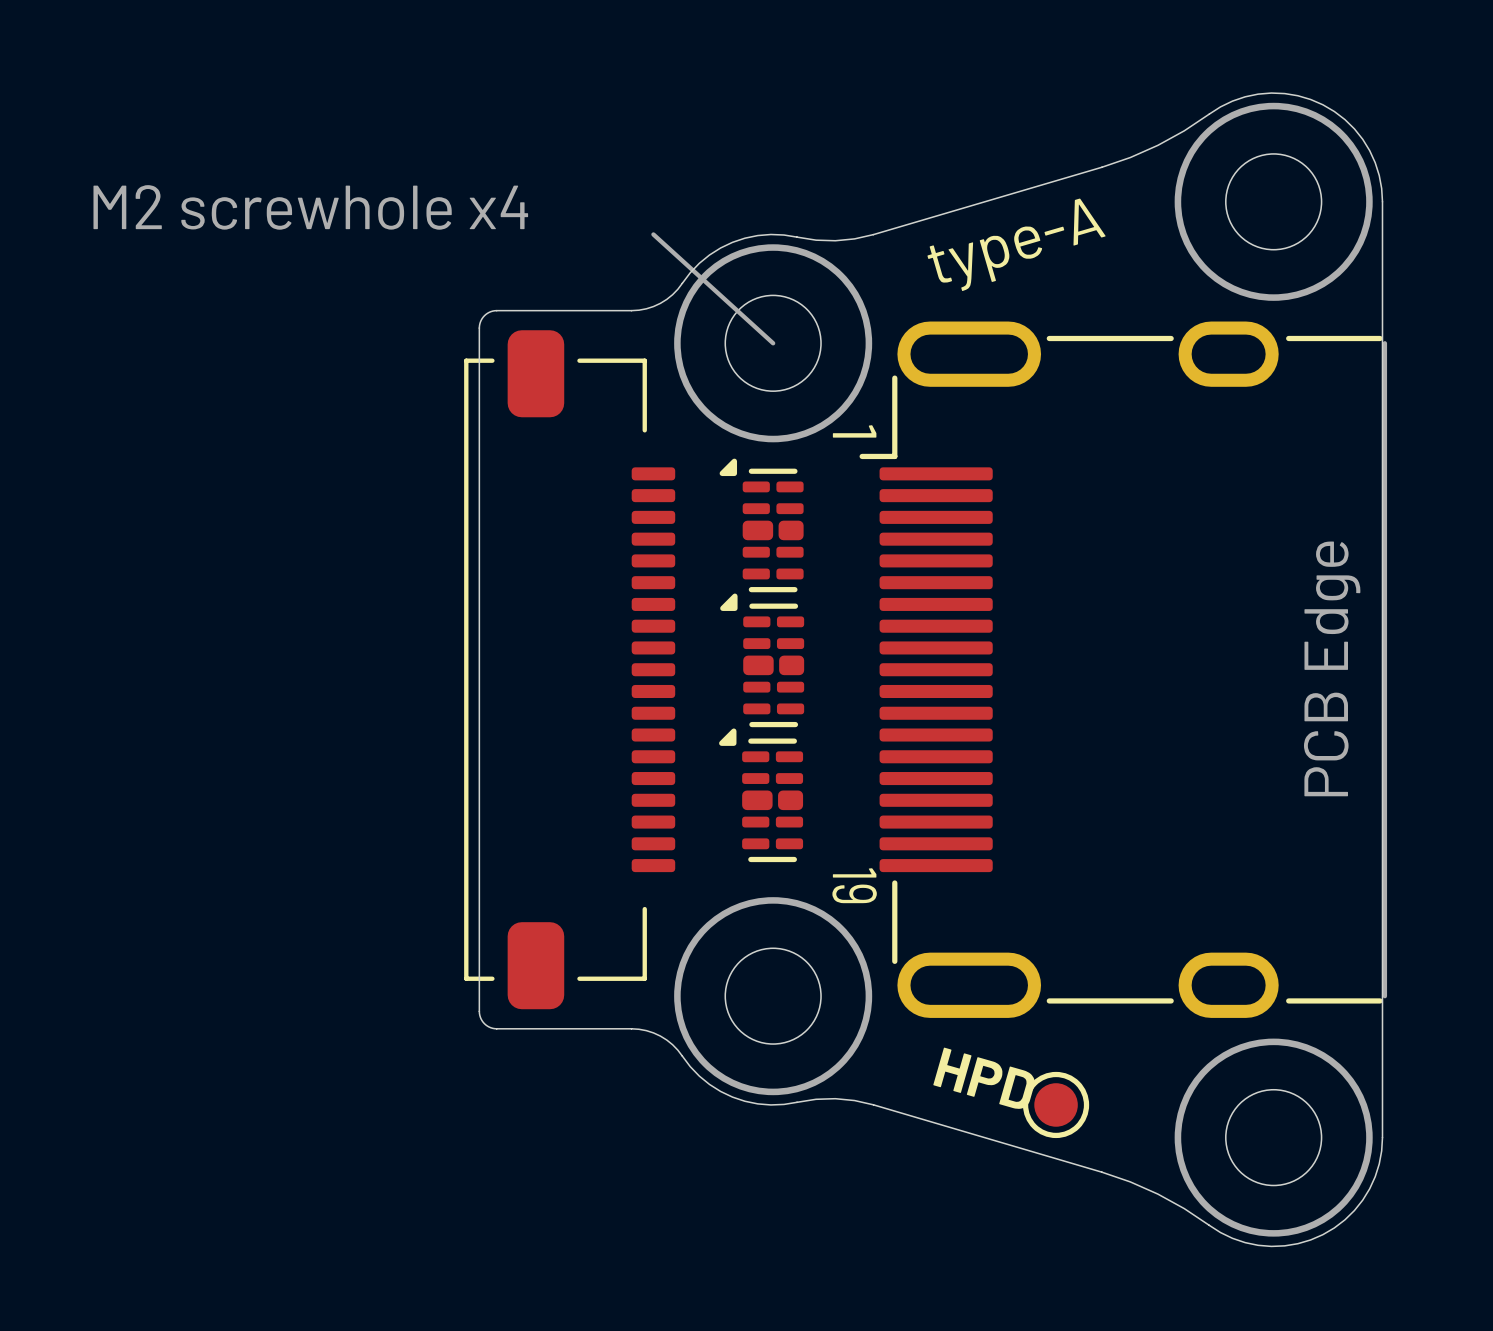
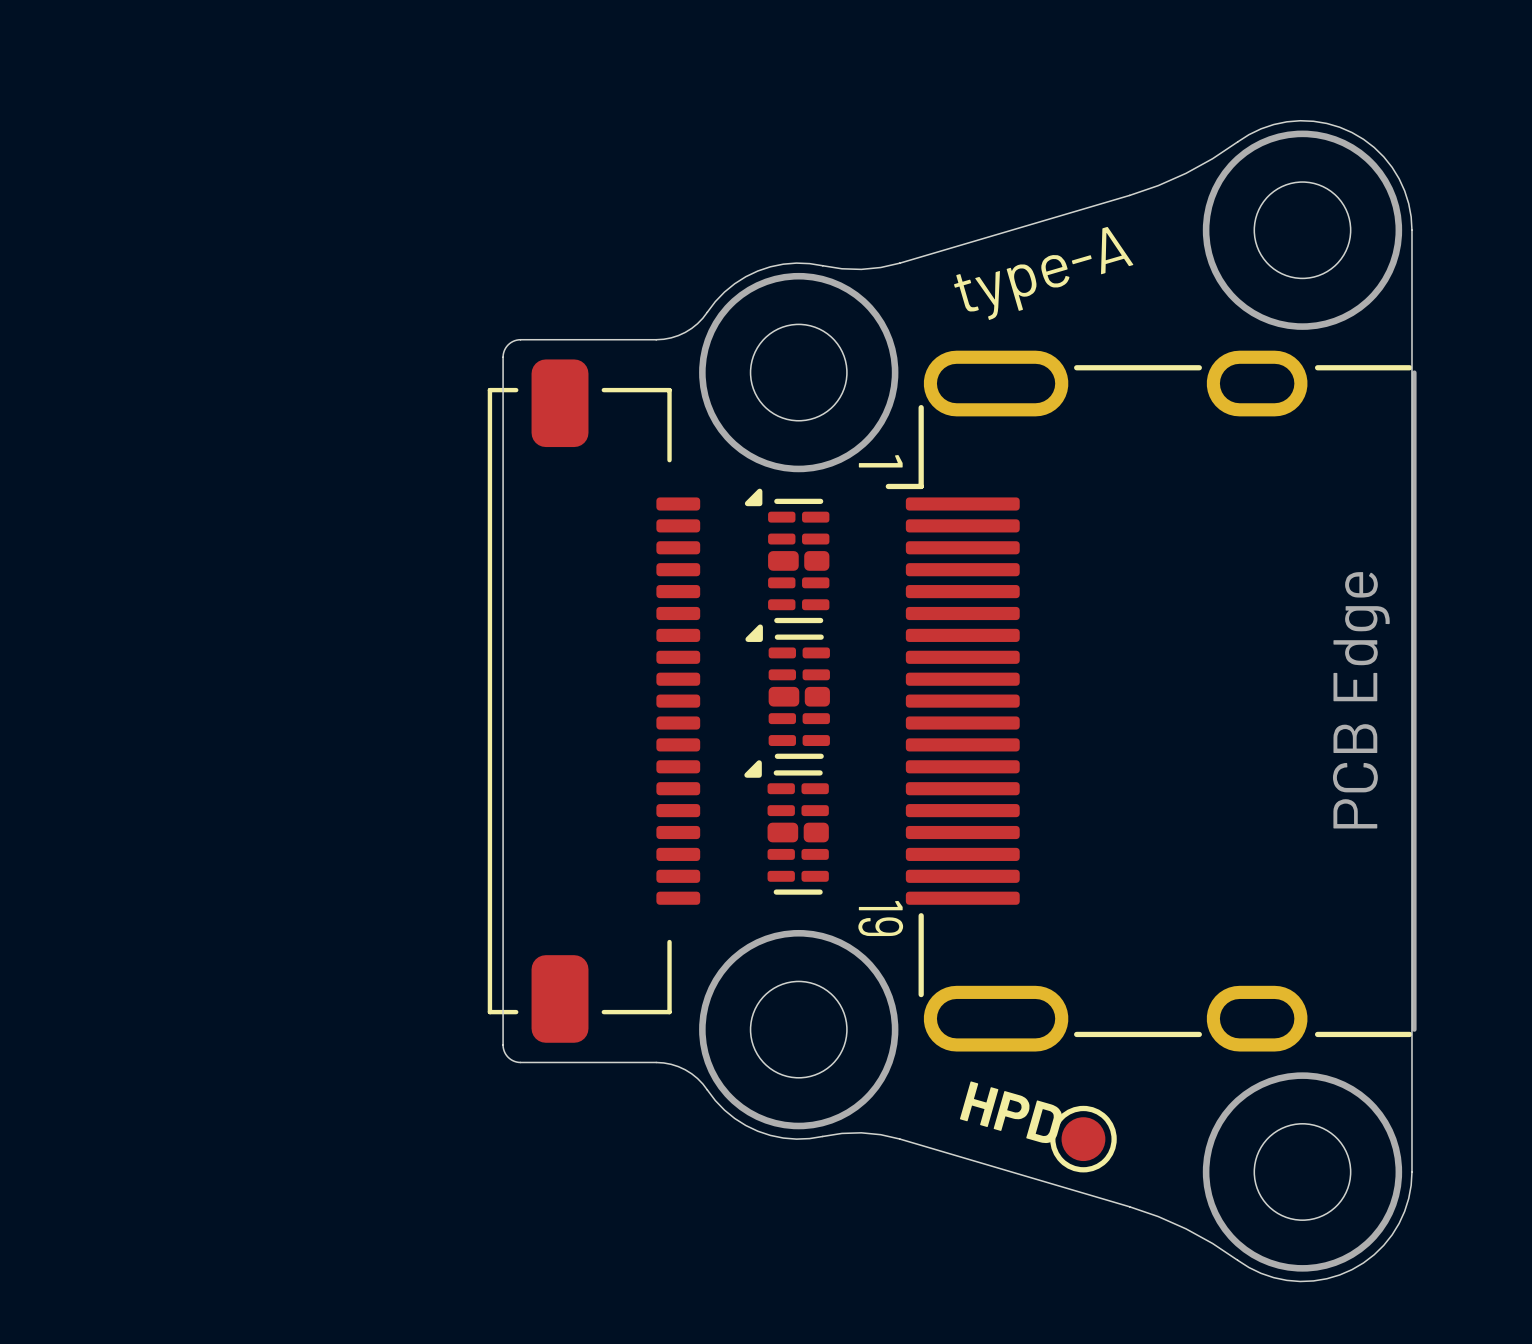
text: M2 screwhole x4 (310, 207) -> none
line: (653, 234) (773, 343) -> none

